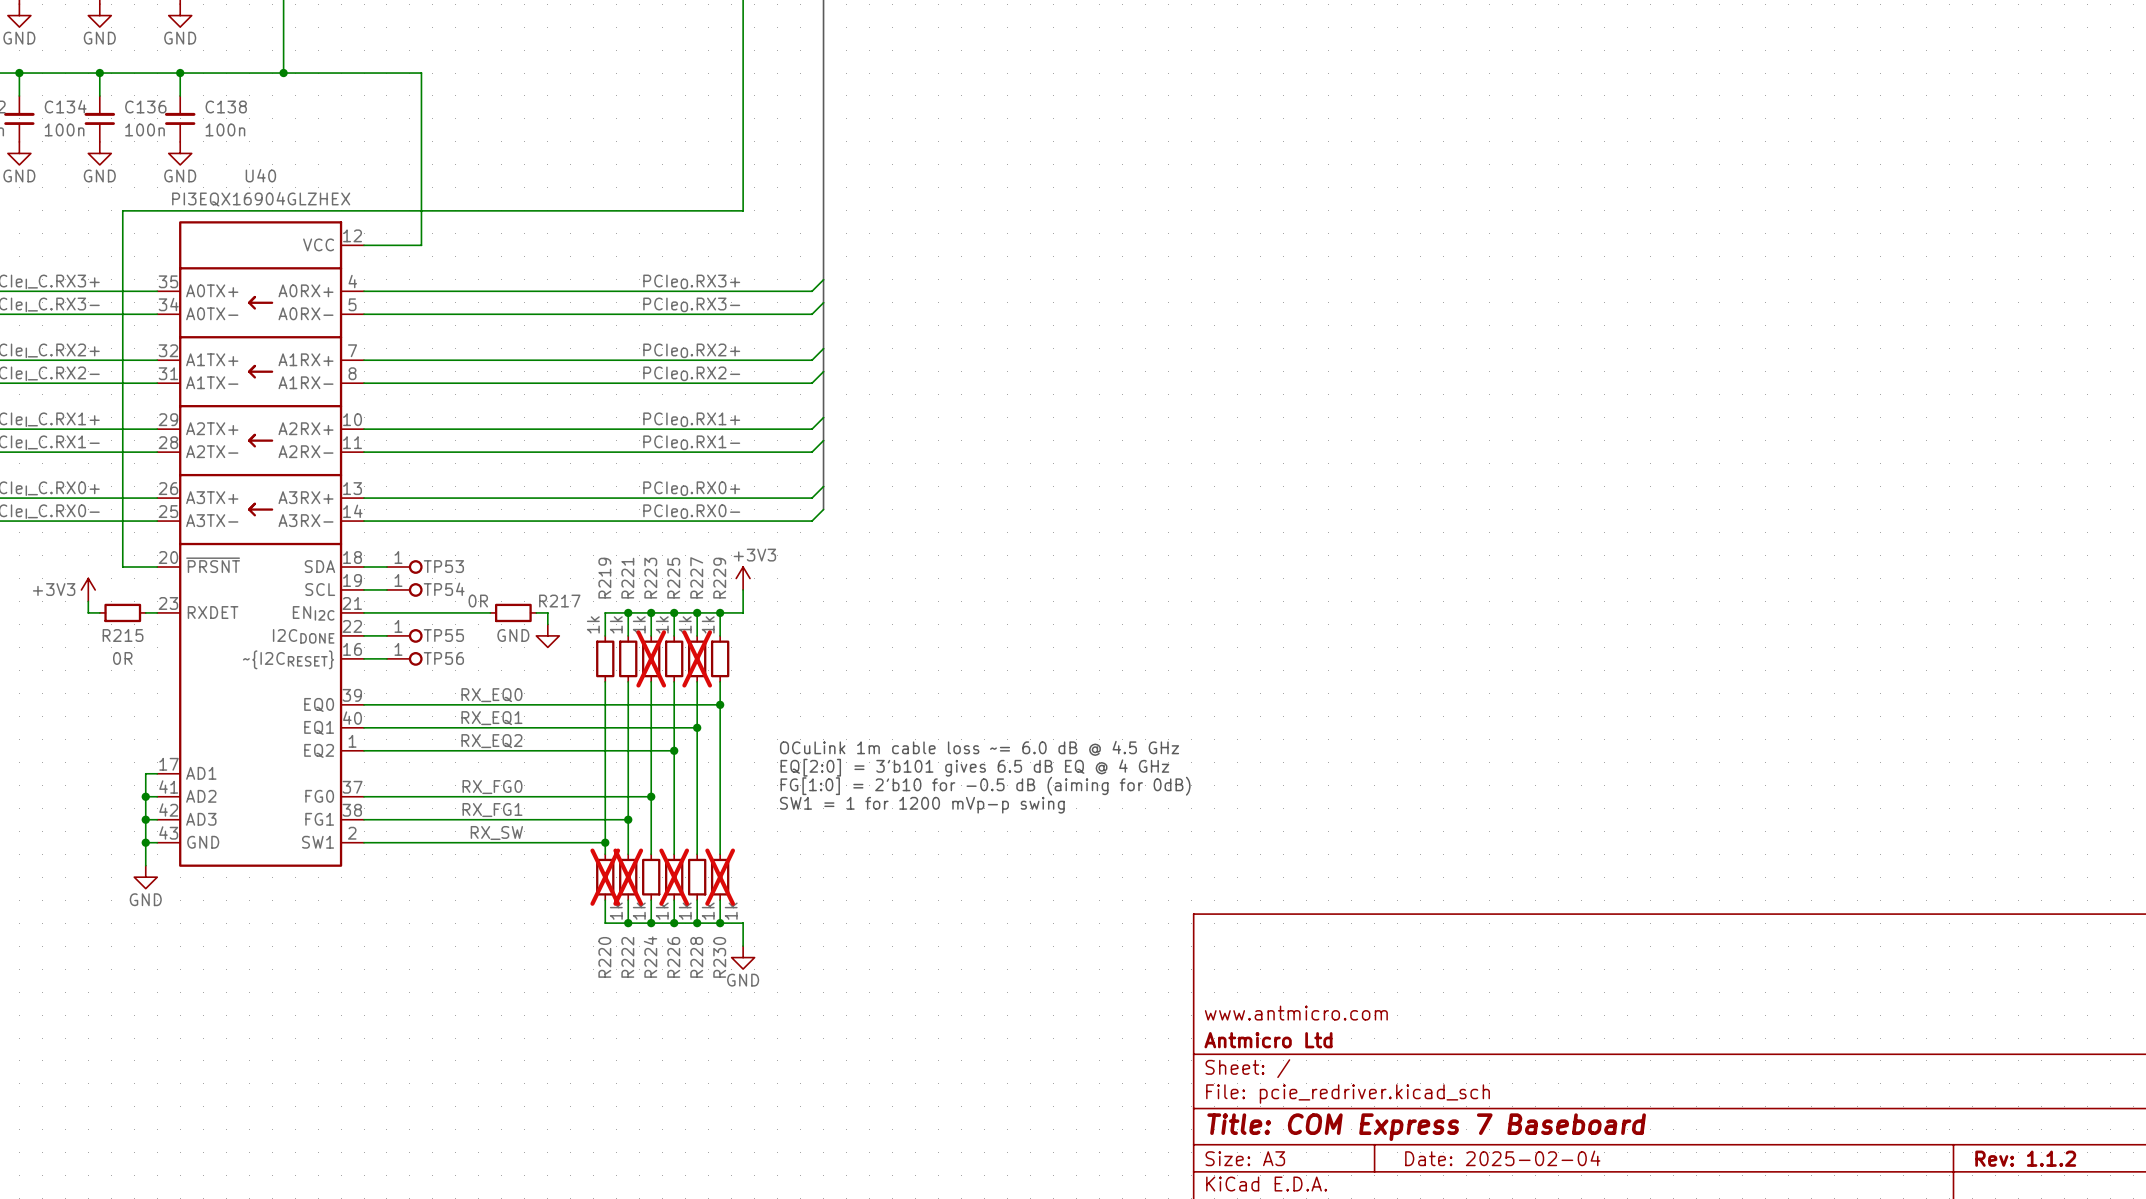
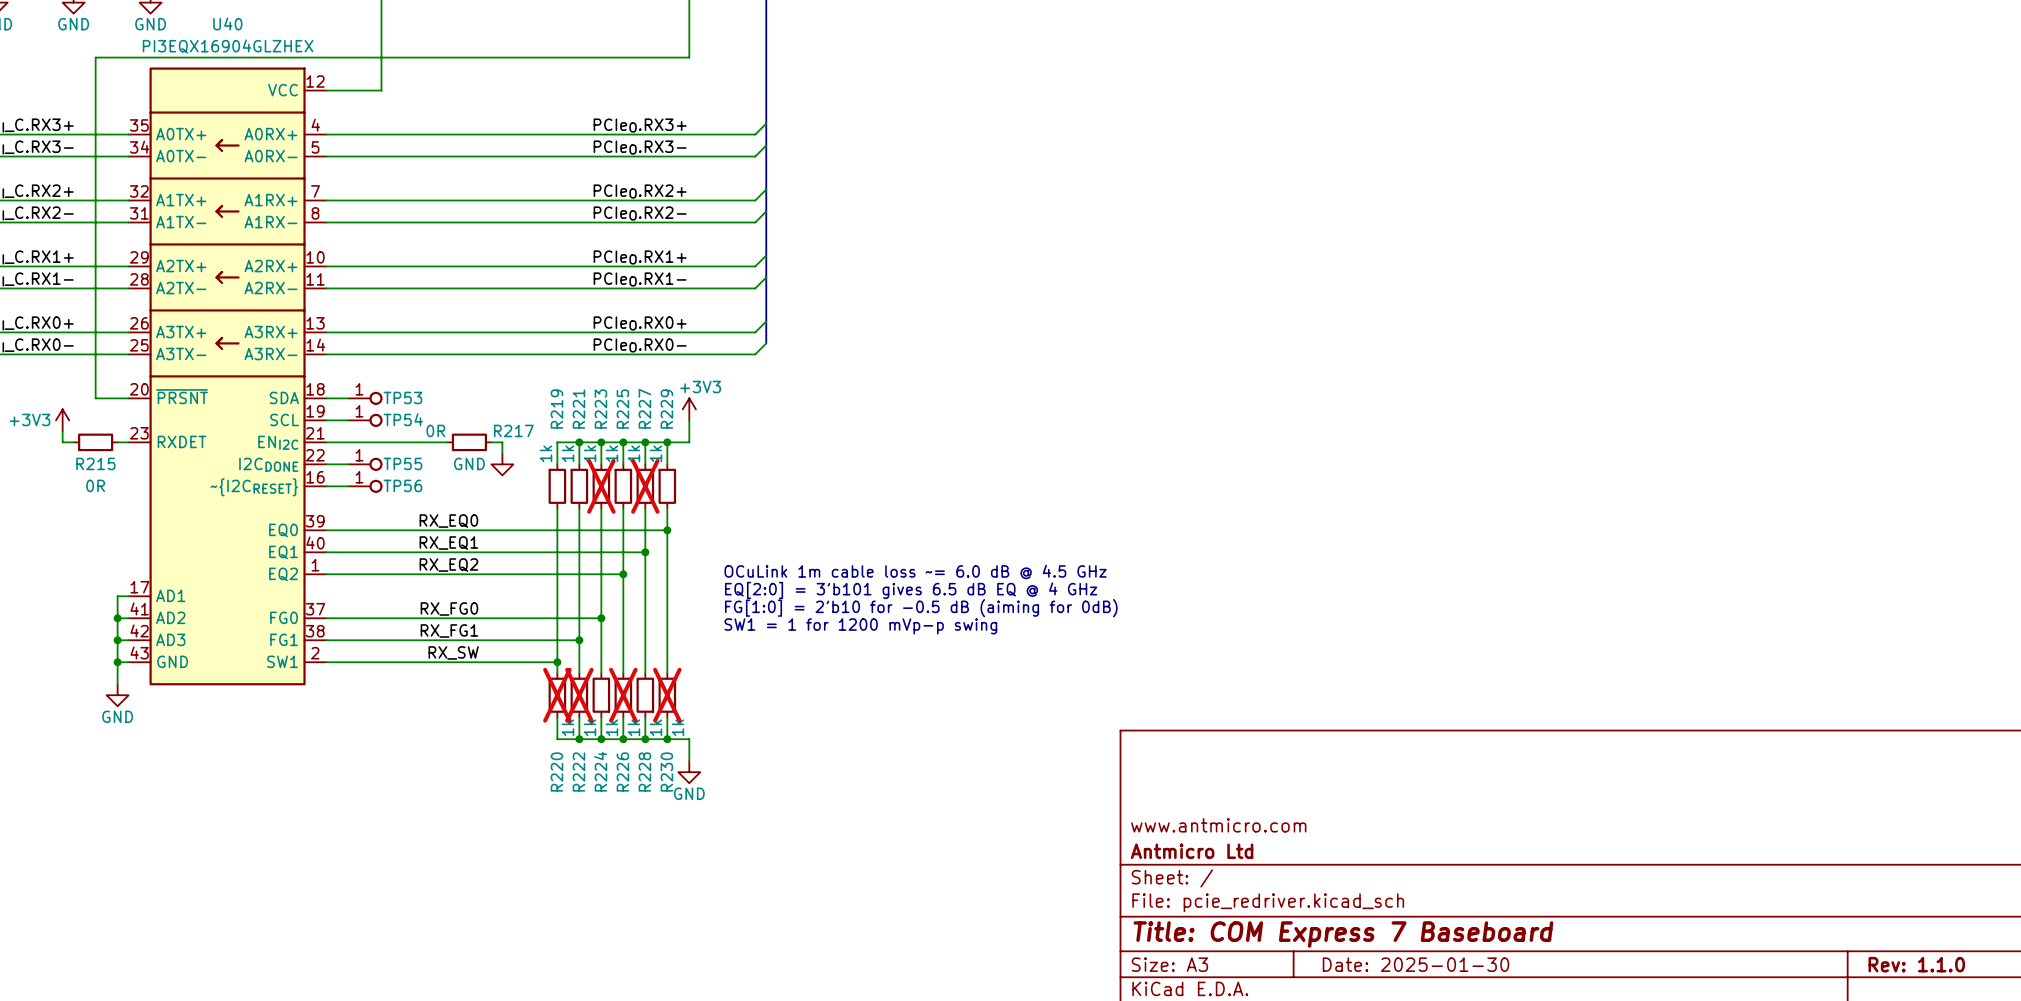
title block: Date: 2025-02-04 (1502, 1158) -> Date: 2025-01-30 (1416, 964)
title block: Rev: 1.1.2 (2025, 1158) -> Rev: 1.1.0 (1916, 964)

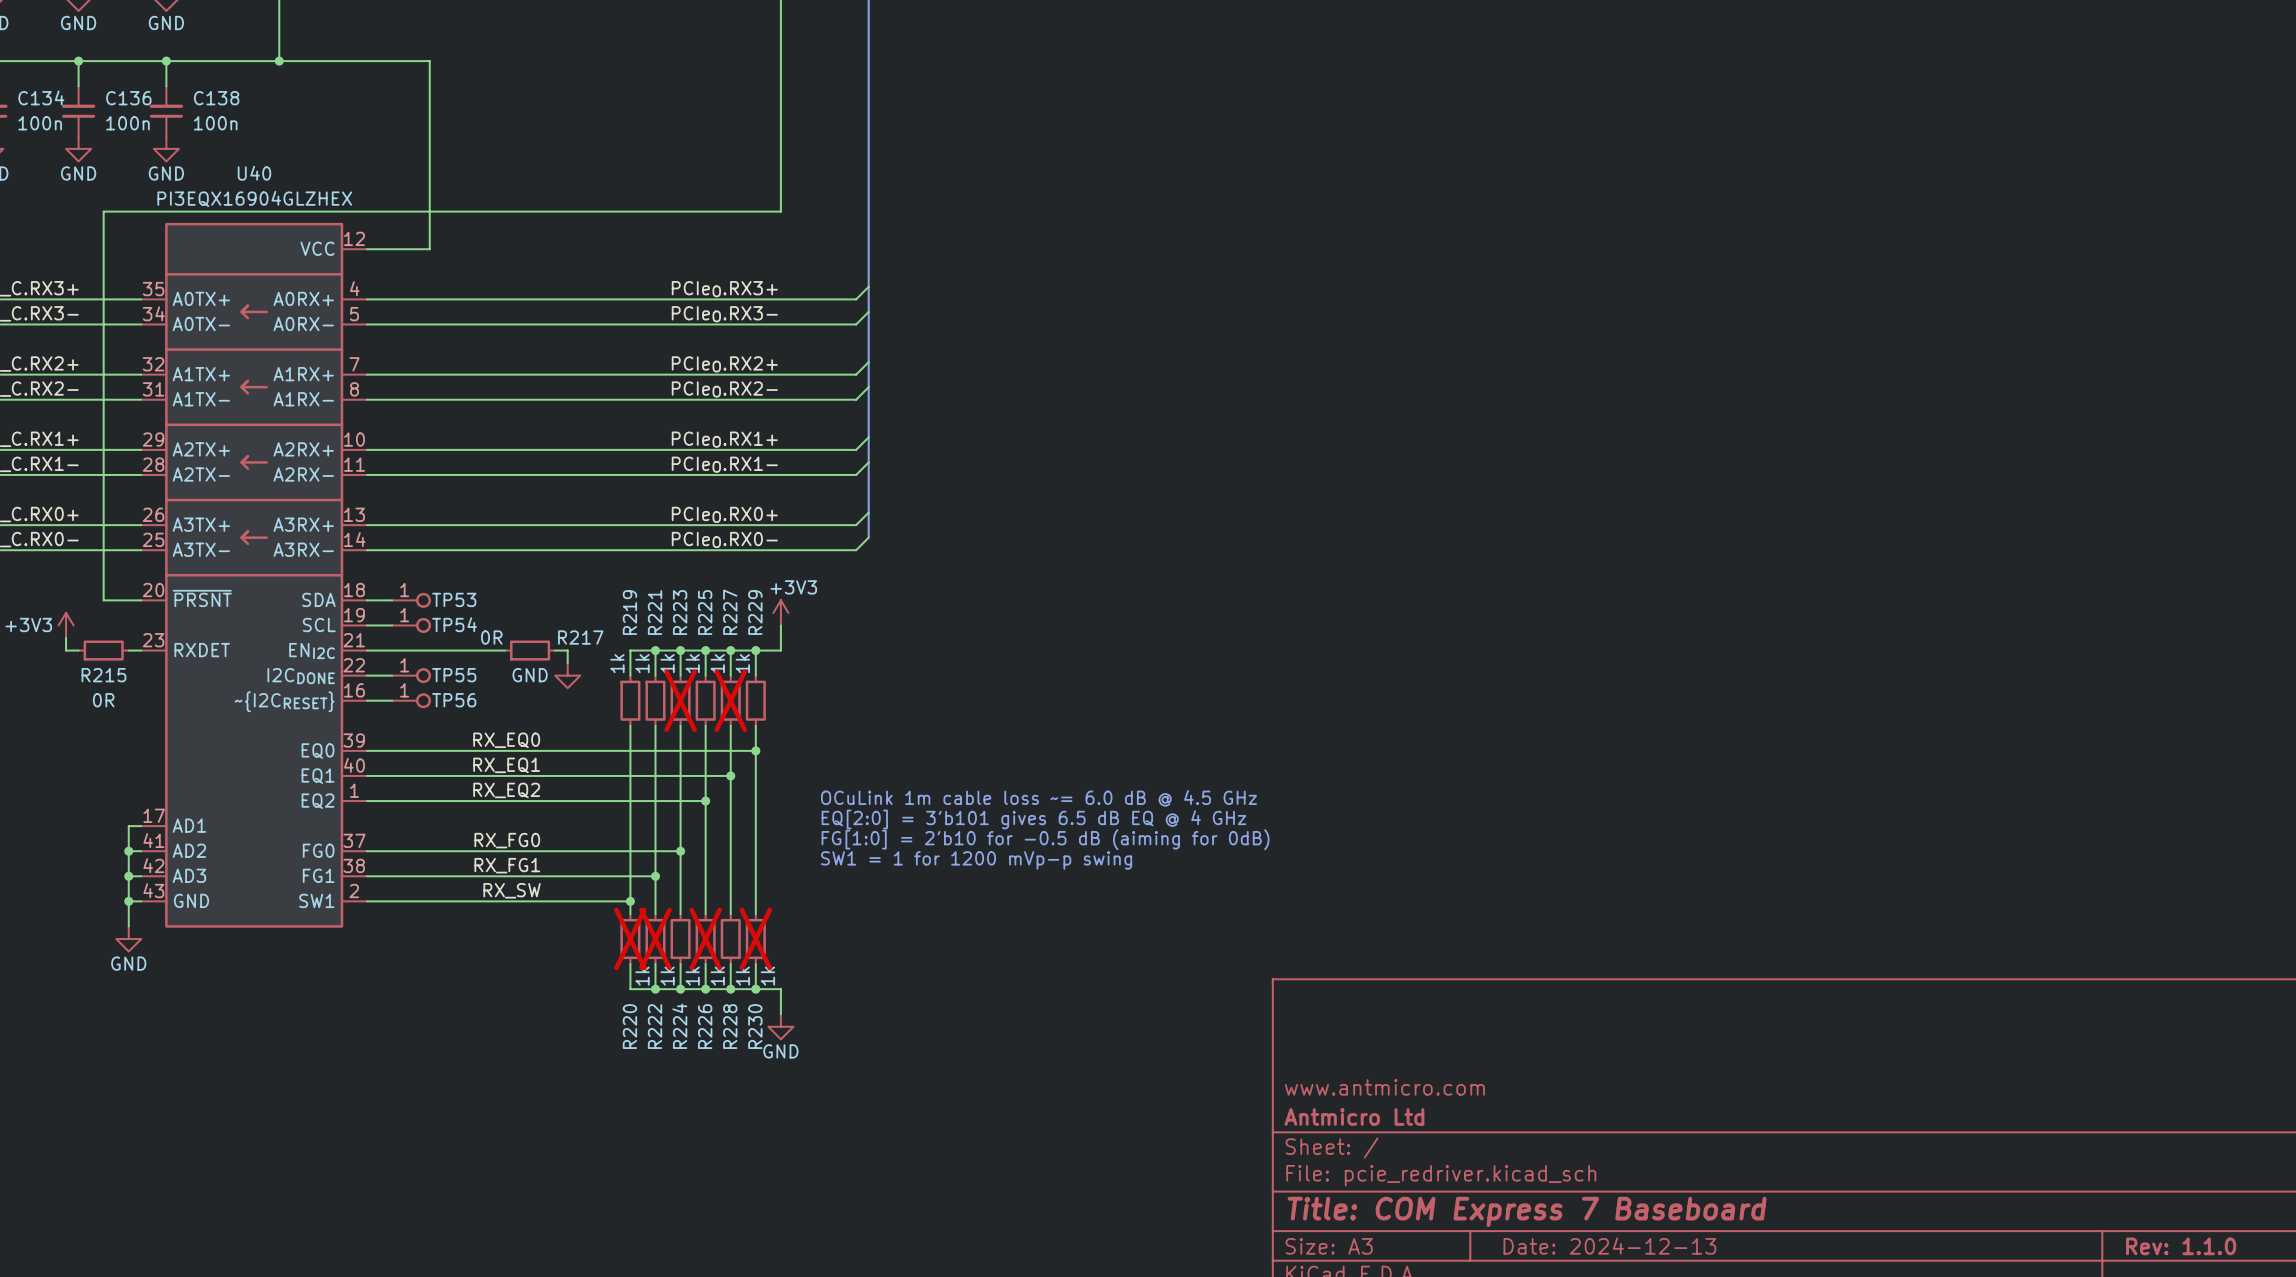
title block: Date: 2025-01-30 (1416, 964) -> Date: 2024-12-13 (1609, 1245)

